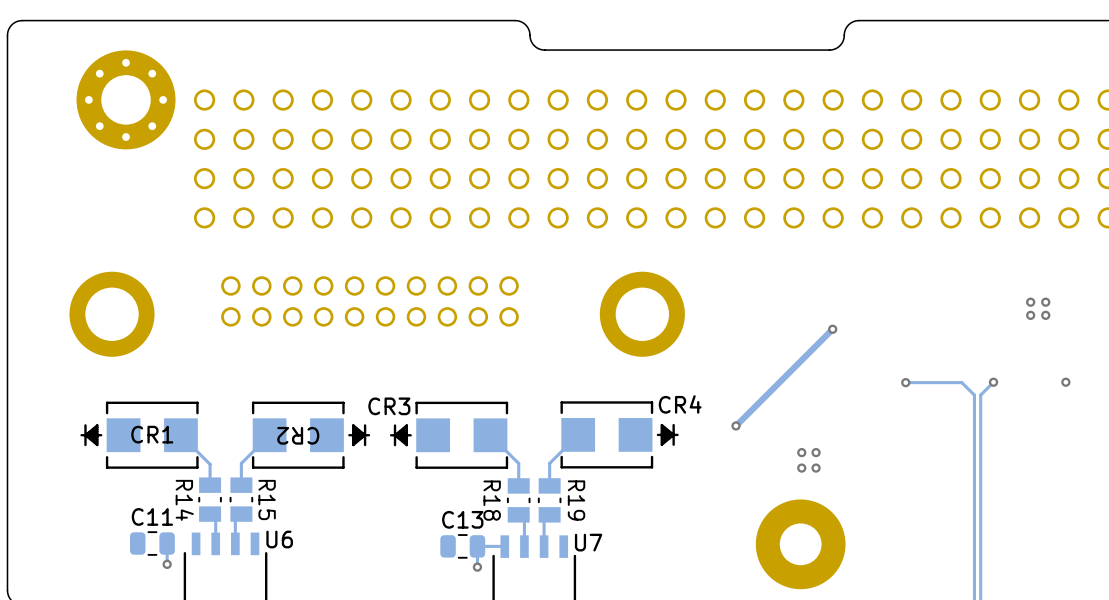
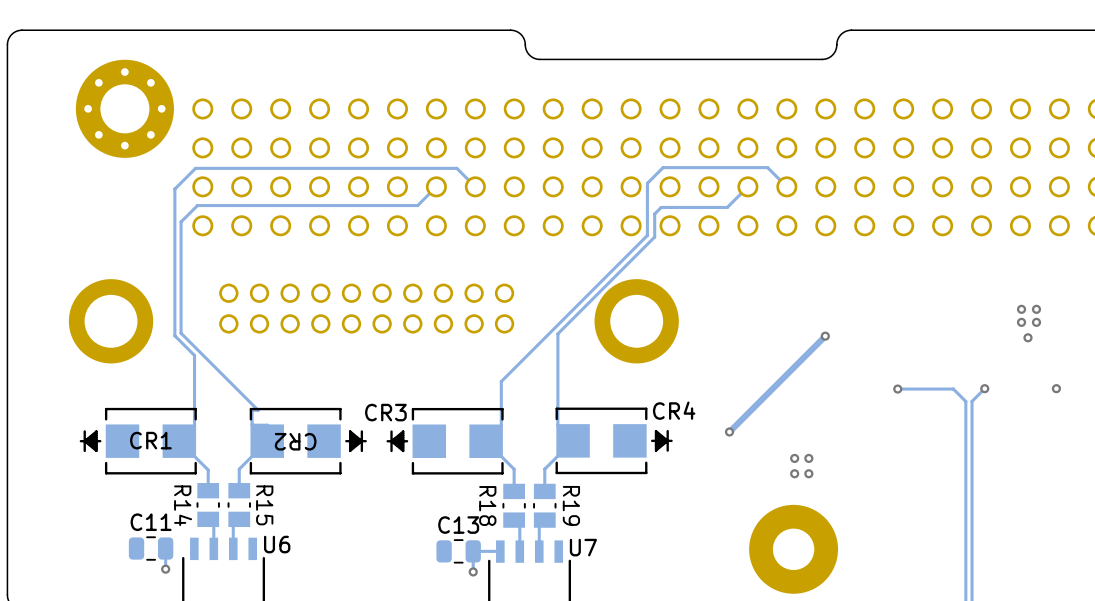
track: none -> (436, 186) (417, 205) (197, 205) (181, 221) (181, 333) (258, 410) (252, 411) (252, 424) (267, 425) (267, 441)
track: none -> (475, 186) (456, 168) (195, 168) (174, 189) (174, 335) (194, 355) (194, 426) (179, 441)
track: none -> (747, 186) (727, 207) (661, 207) (654, 213) (654, 237) (557, 333) (557, 425) (573, 440)
track: none -> (786, 186) (767, 167) (663, 167) (647, 183) (647, 235) (501, 381) (501, 426) (486, 441)
via: none -> (1027, 337)

